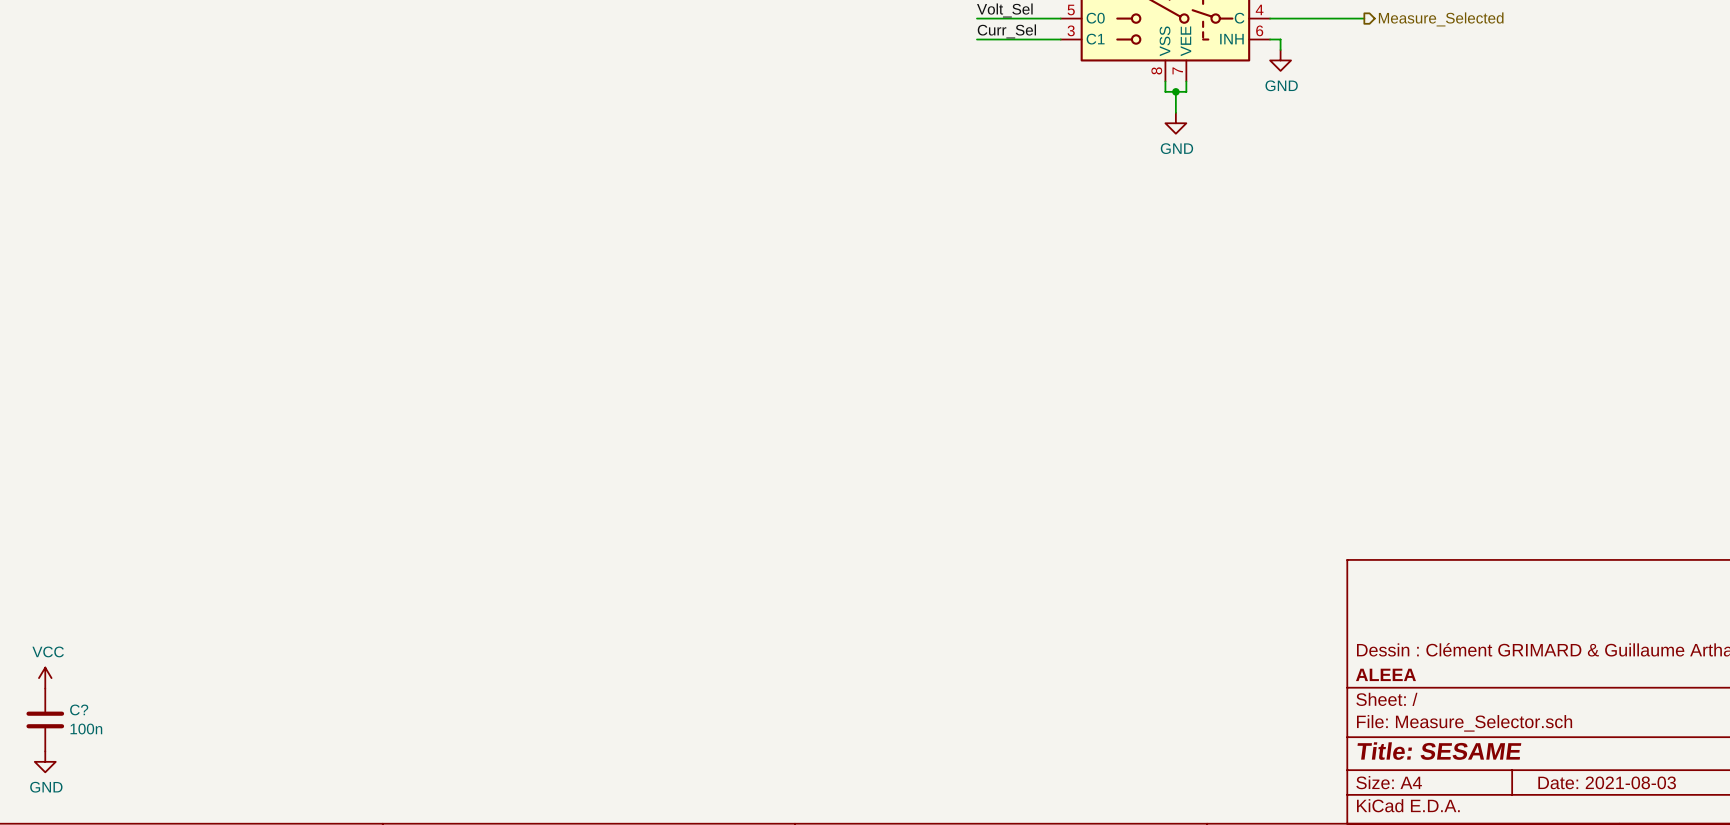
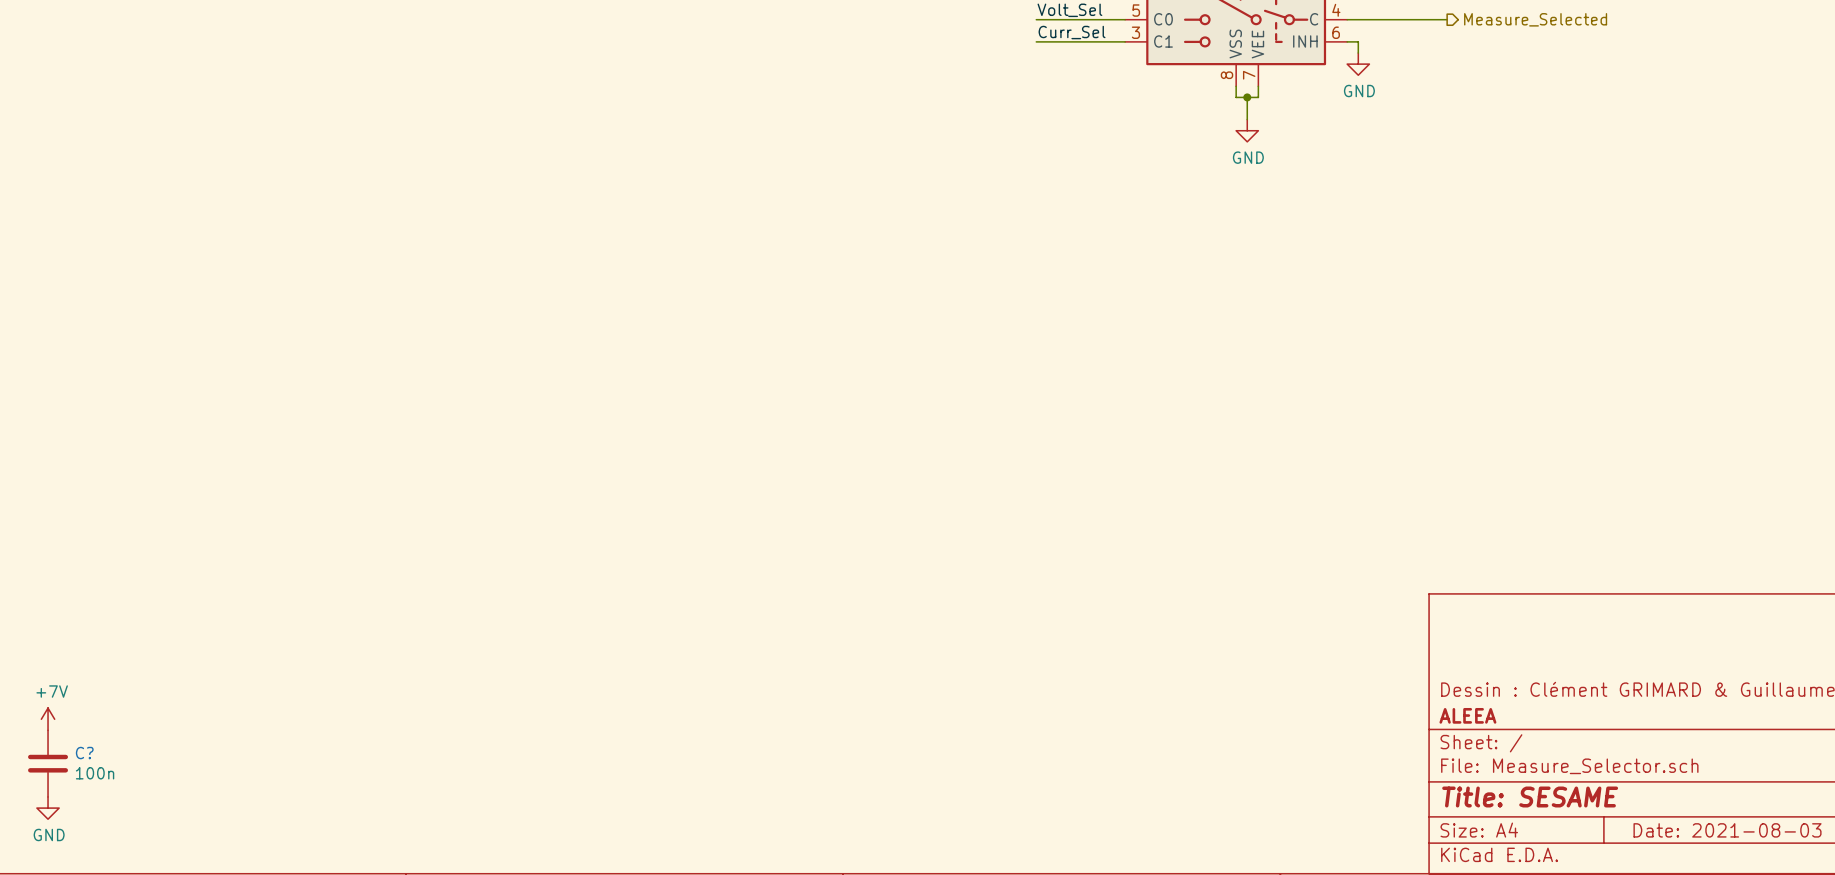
power symbol: VCC (45, 678) -> +7V (48, 719)

